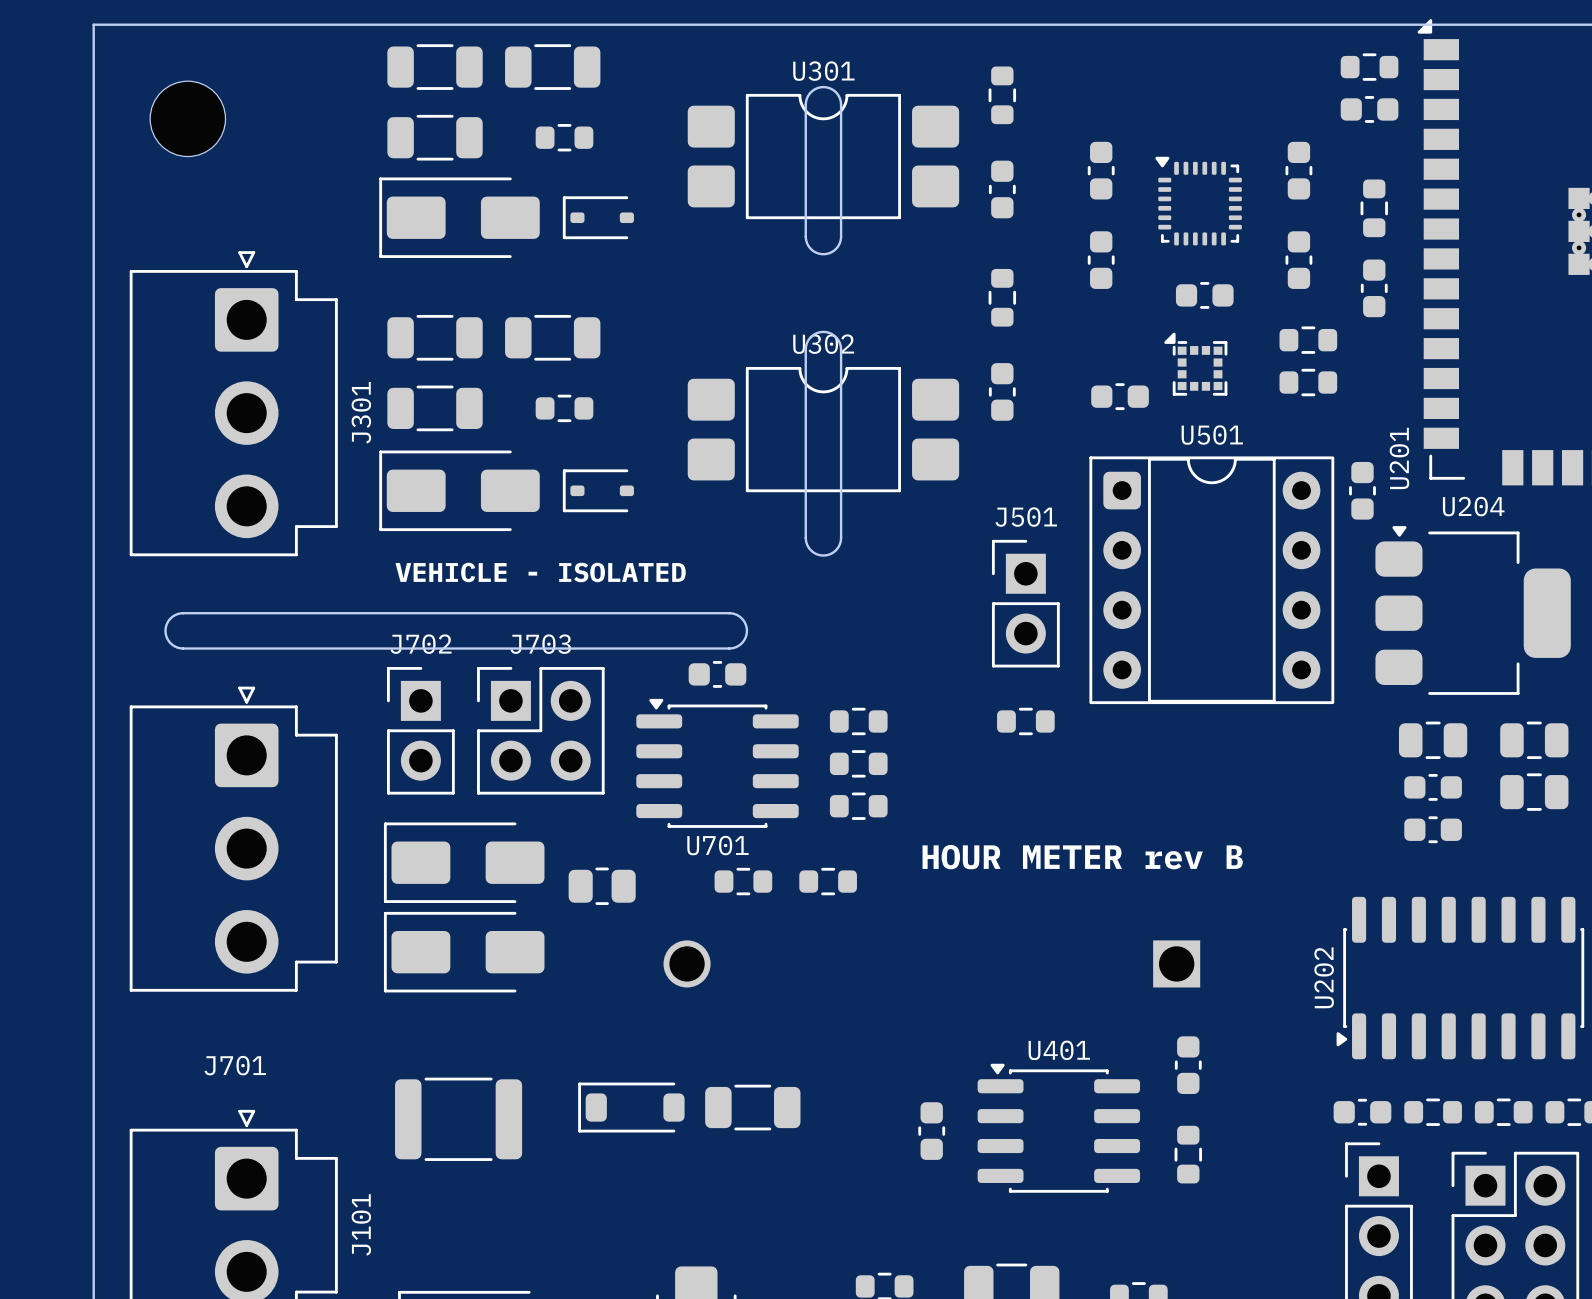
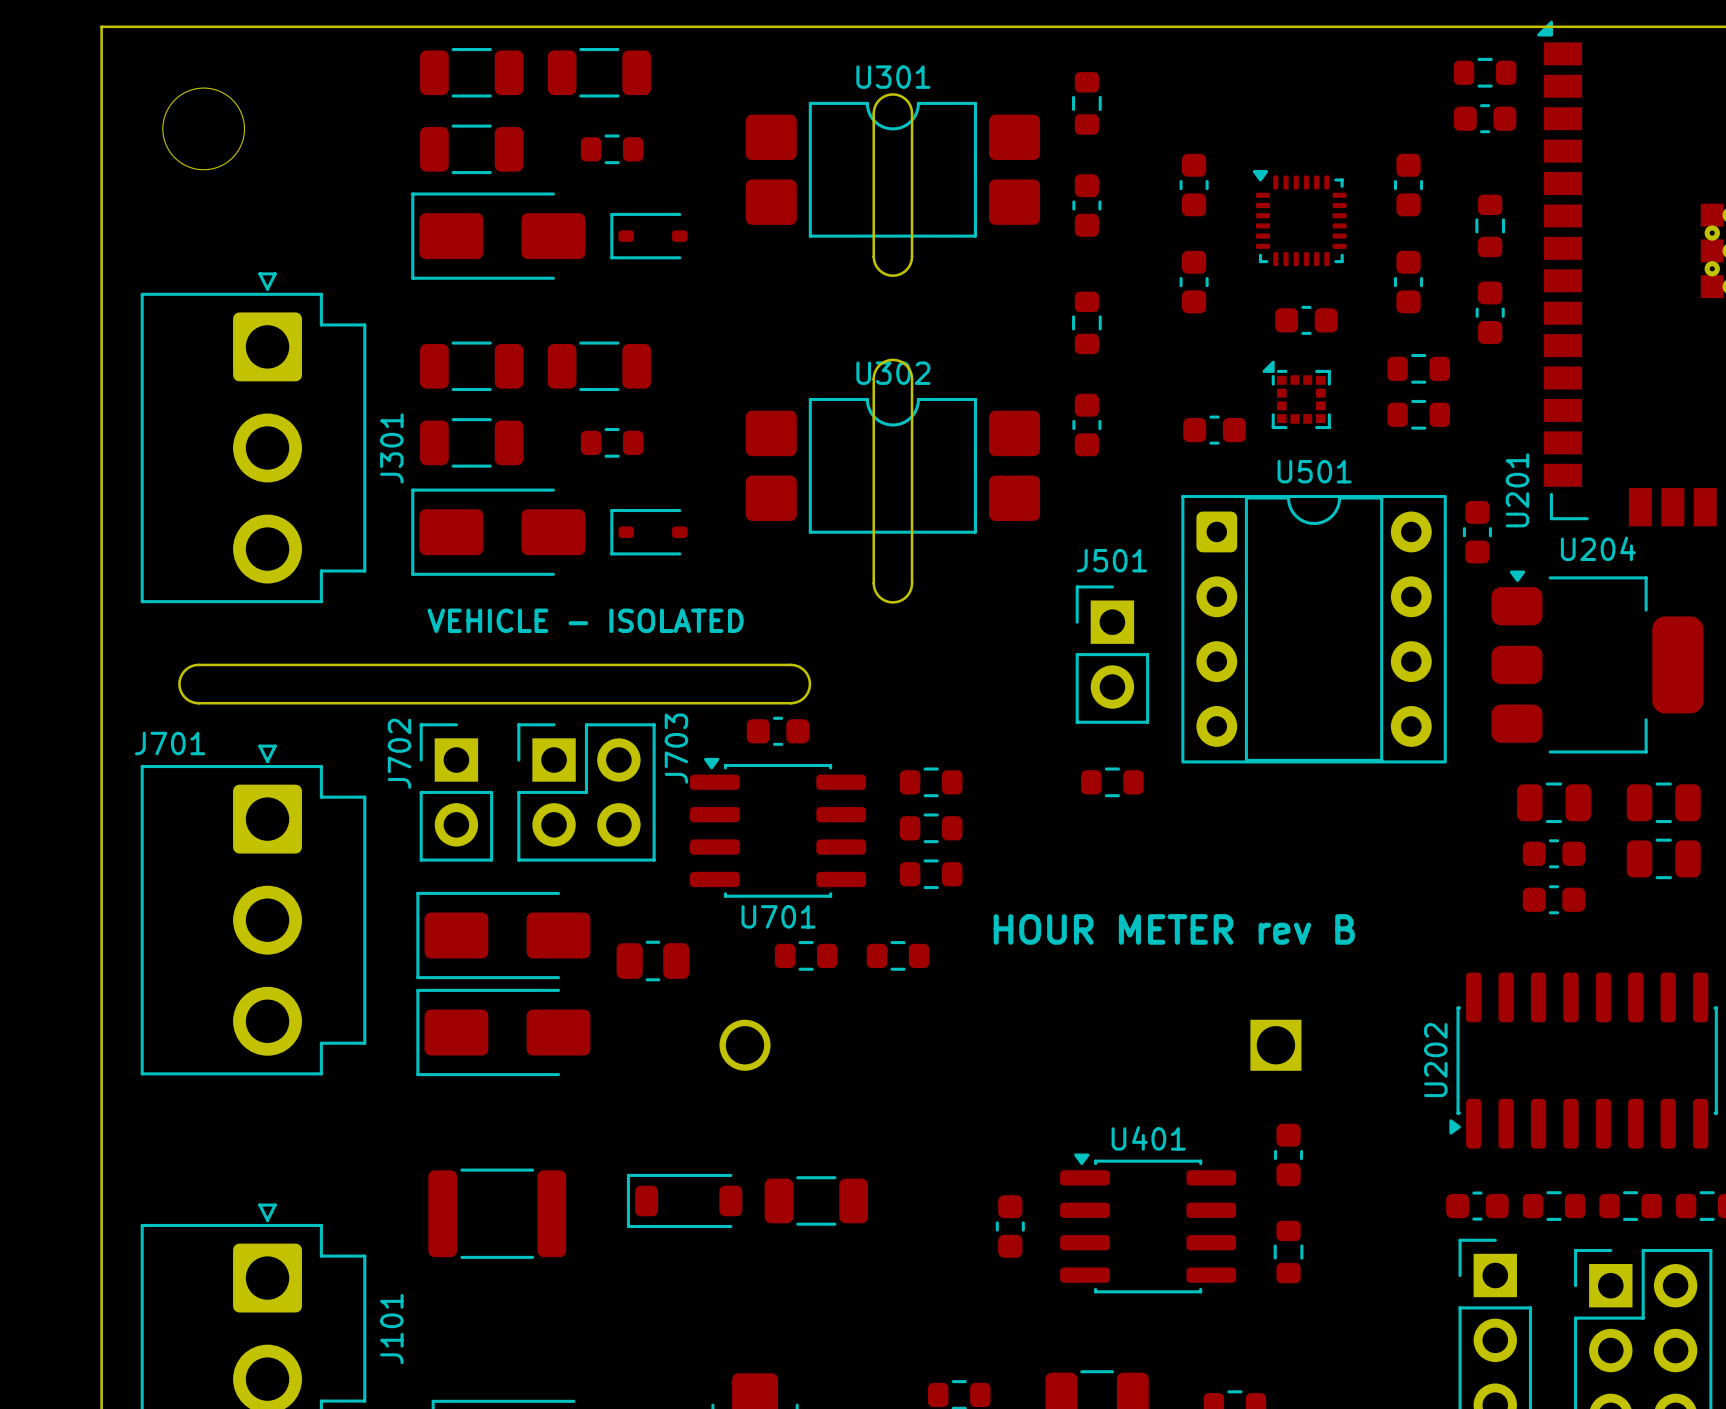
J702 name rotation: 0° (421, 644) -> 90° counterclockwise (399, 753)
J703 name rotation: 0° (540, 644) -> 90° counterclockwise (676, 748)
J703 name position: J703 (540, 644) -> J703 (676, 748)
J701 name position: J701 (235, 1065) -> J701 (170, 743)

